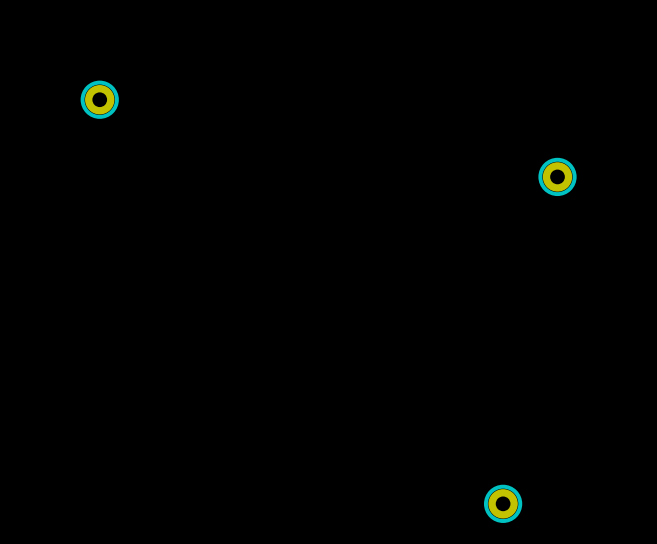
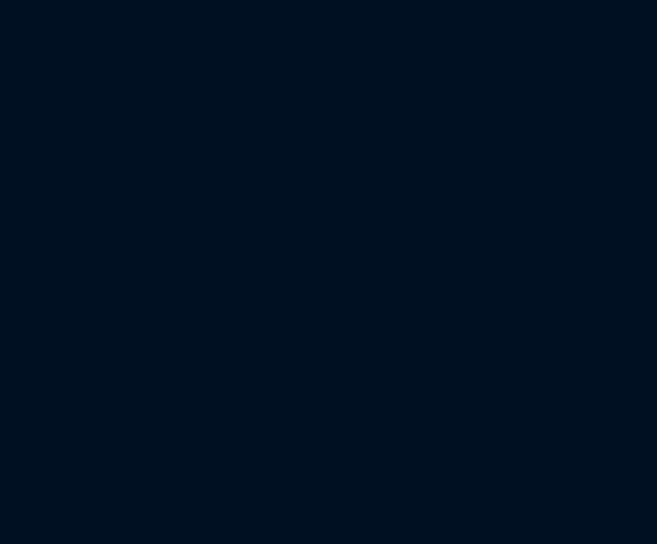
part: (99, 99) -> none
part: (557, 176) -> none
part: (503, 503) -> none

